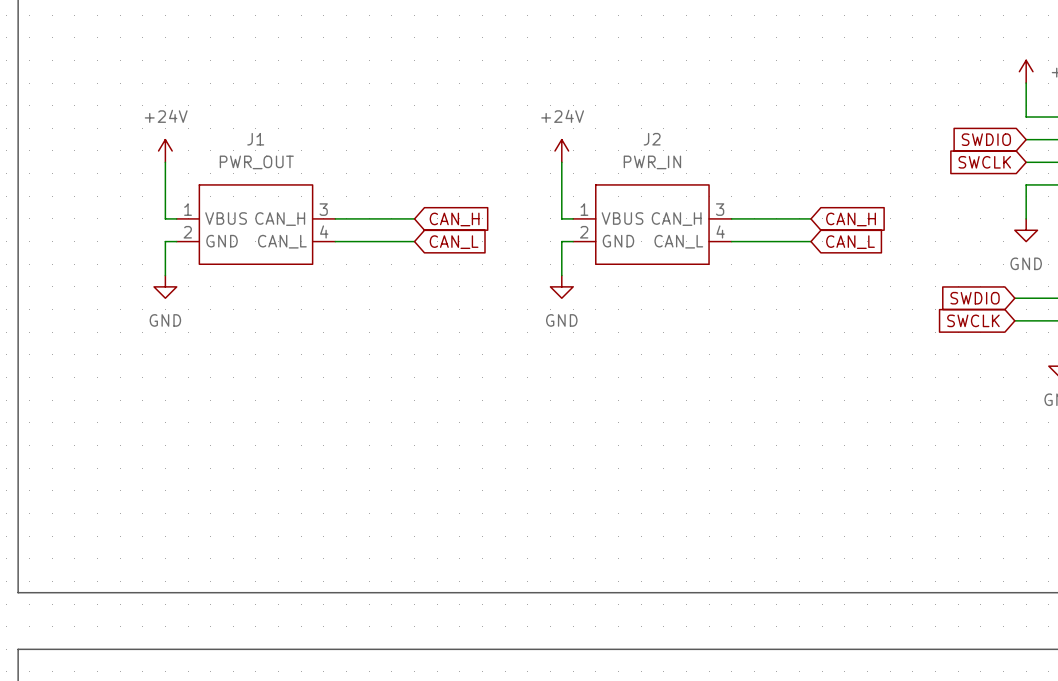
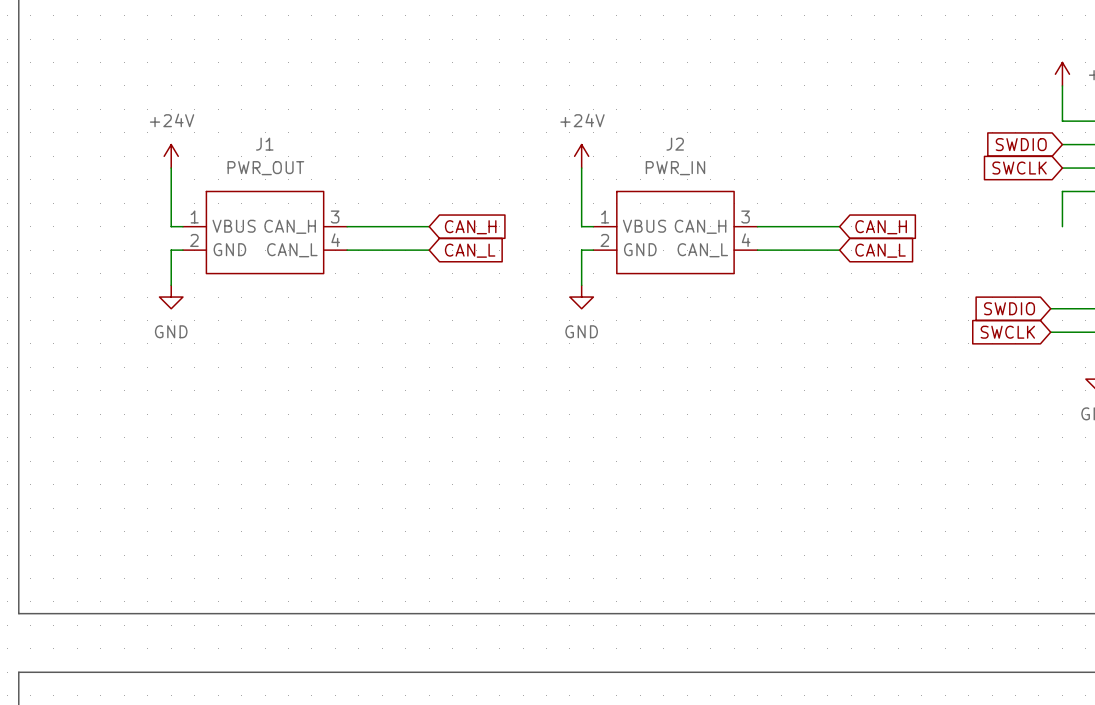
power symbol: GND (1026, 230) -> none

